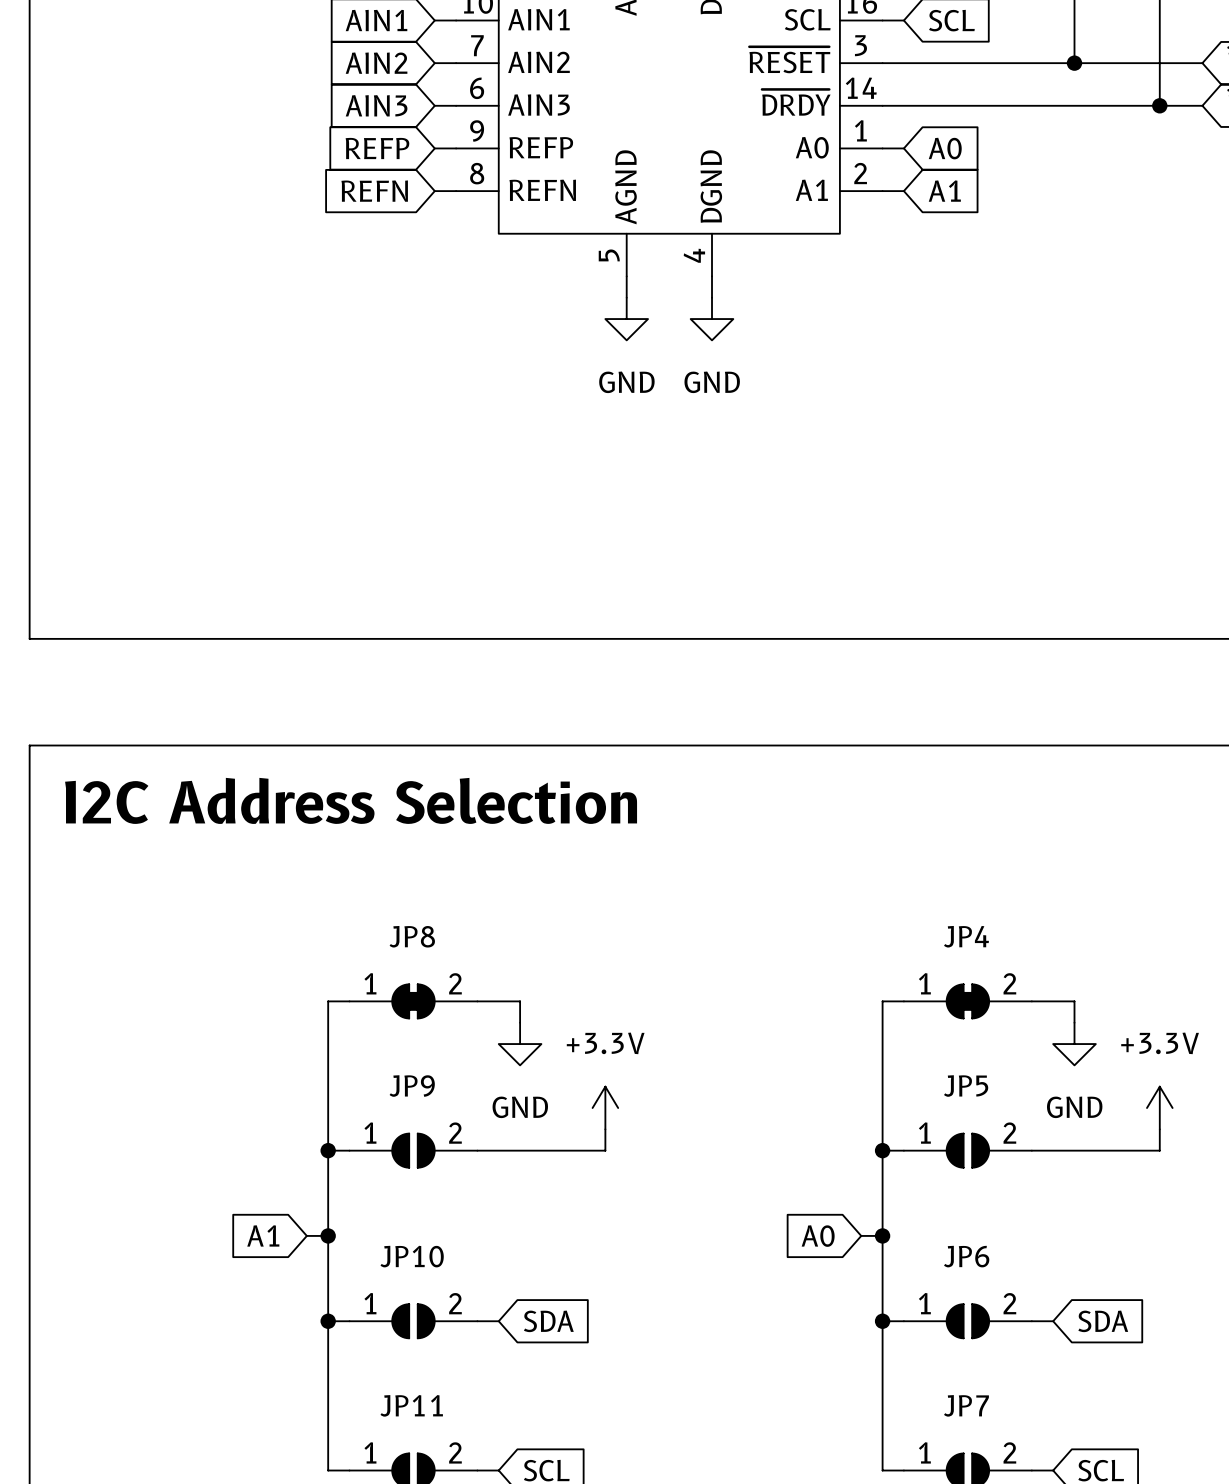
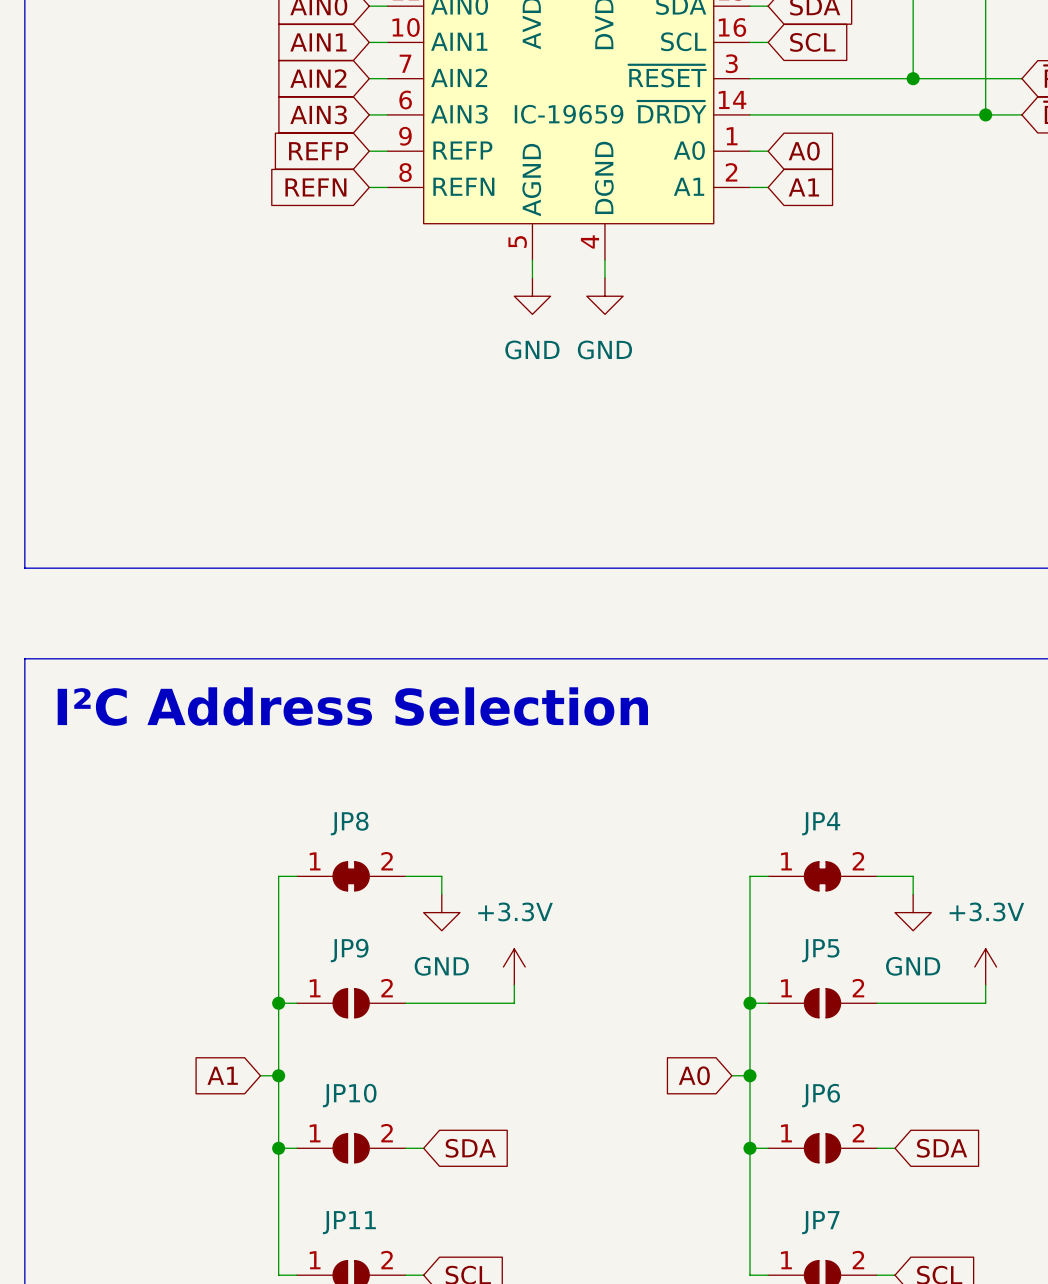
part text: none -> IC-19659 (569, 114)
text: I2C Address Selection (351, 800) -> I²C Address Selection (352, 706)

